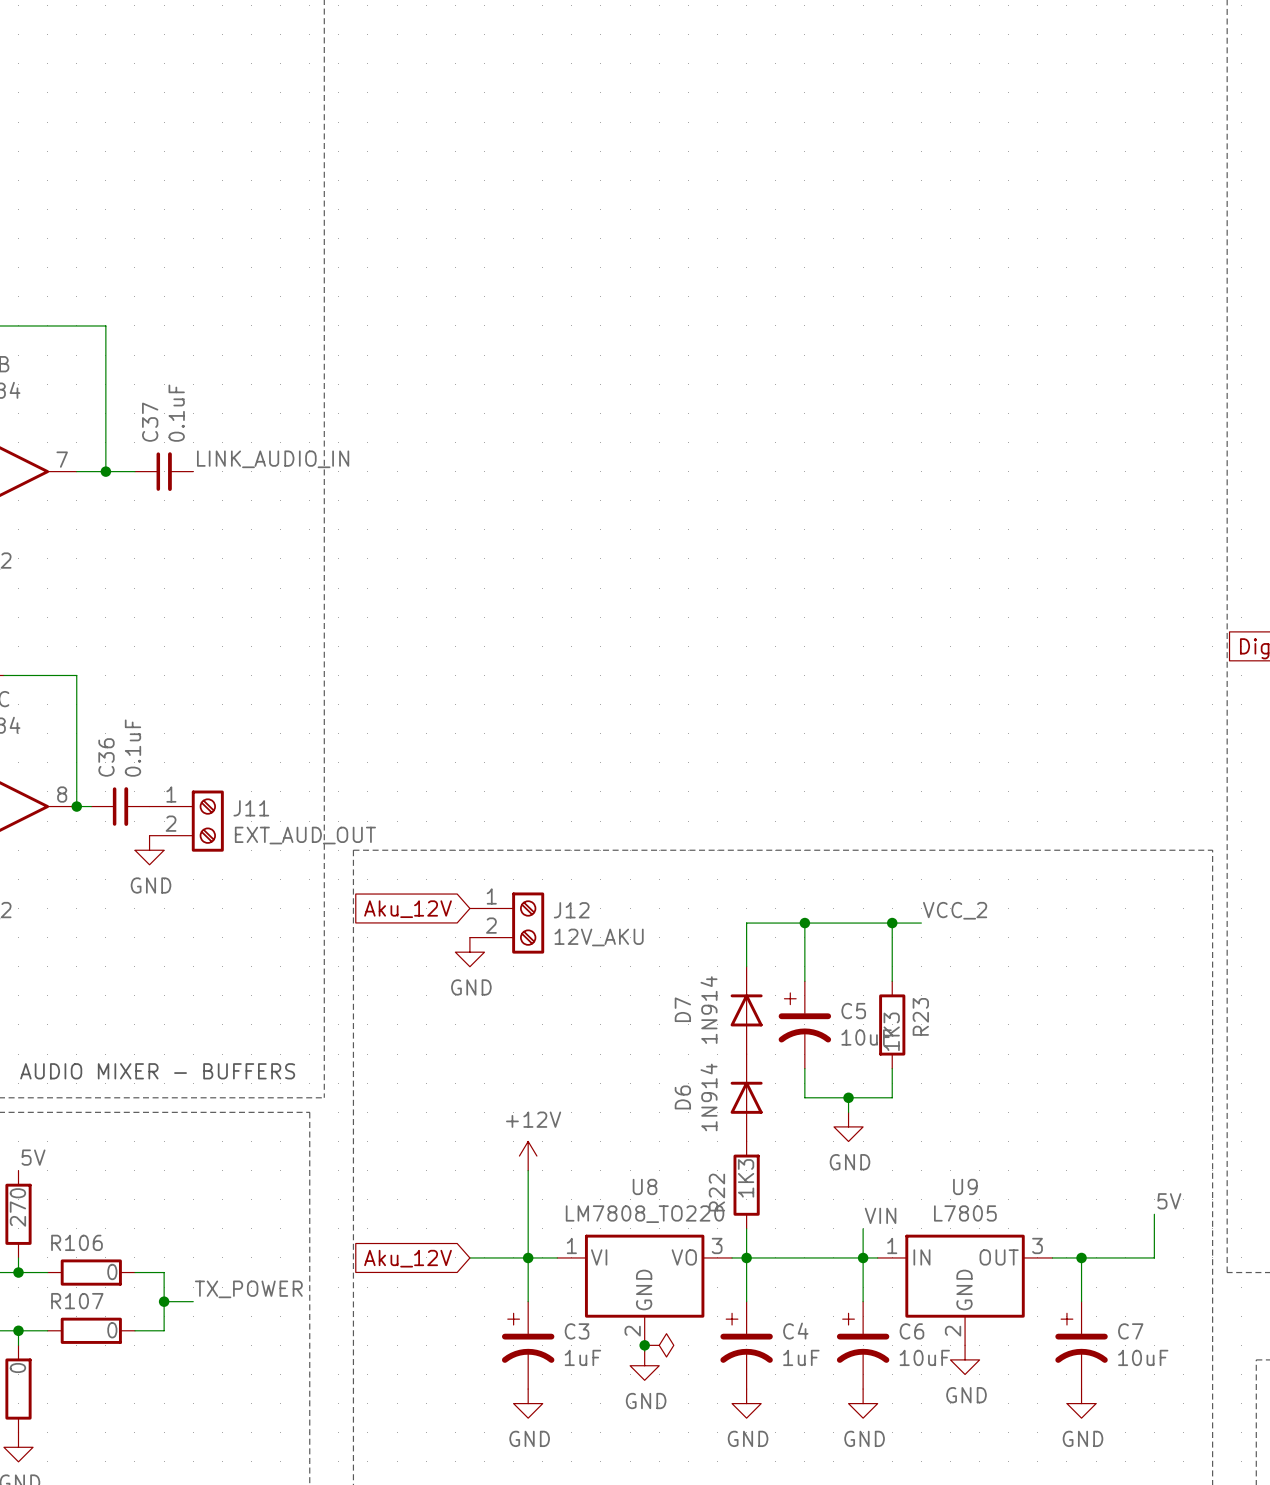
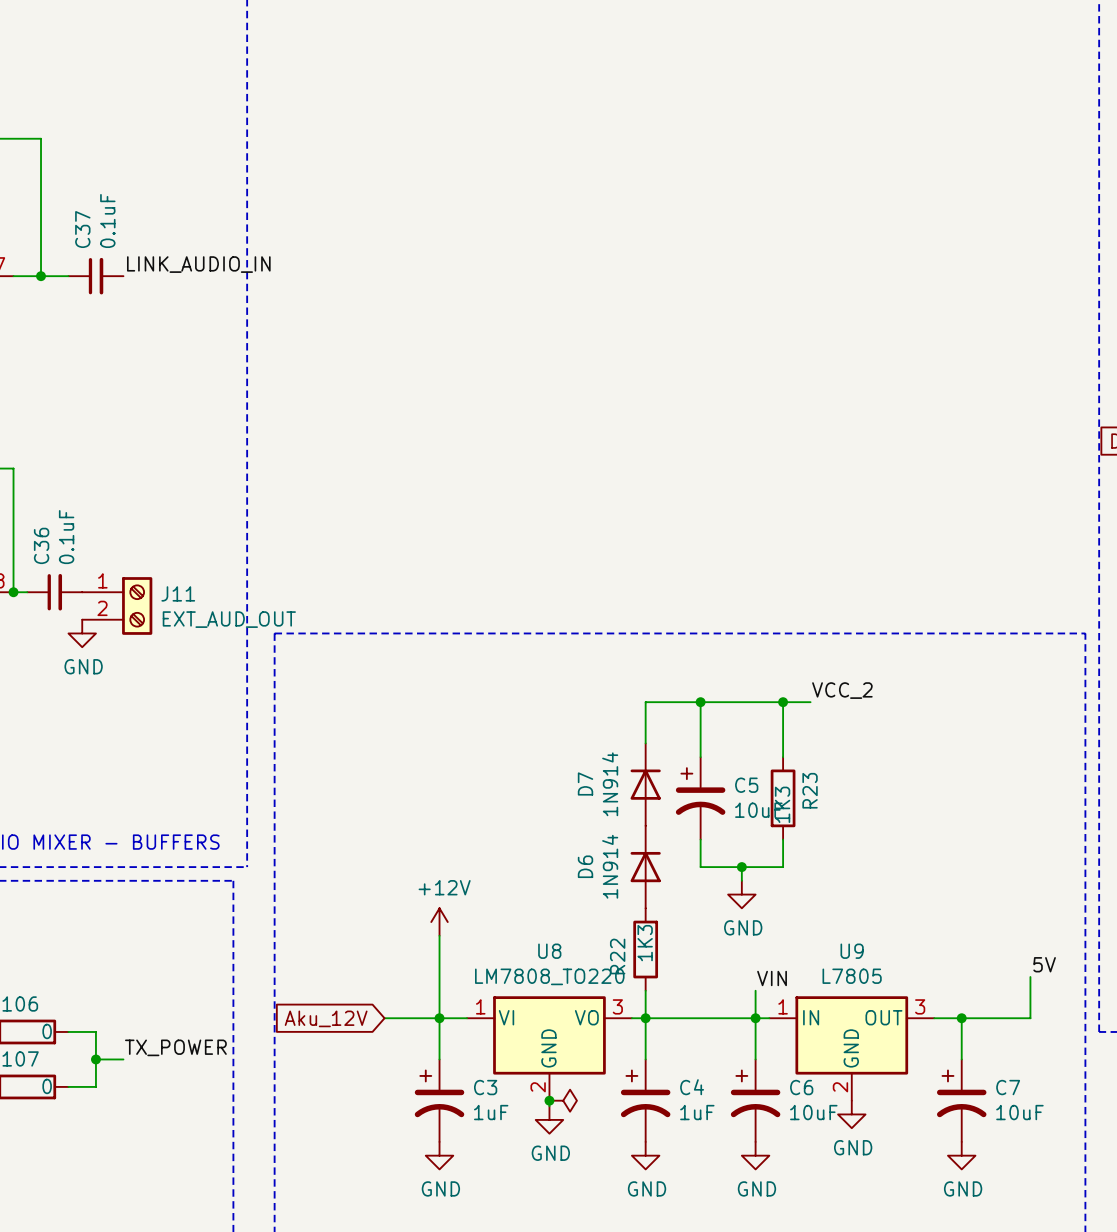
global label: Aku_12V (408, 909) -> none
J12: 12V_AKU (507, 923) -> none
power symbol: GND (469, 952) -> none

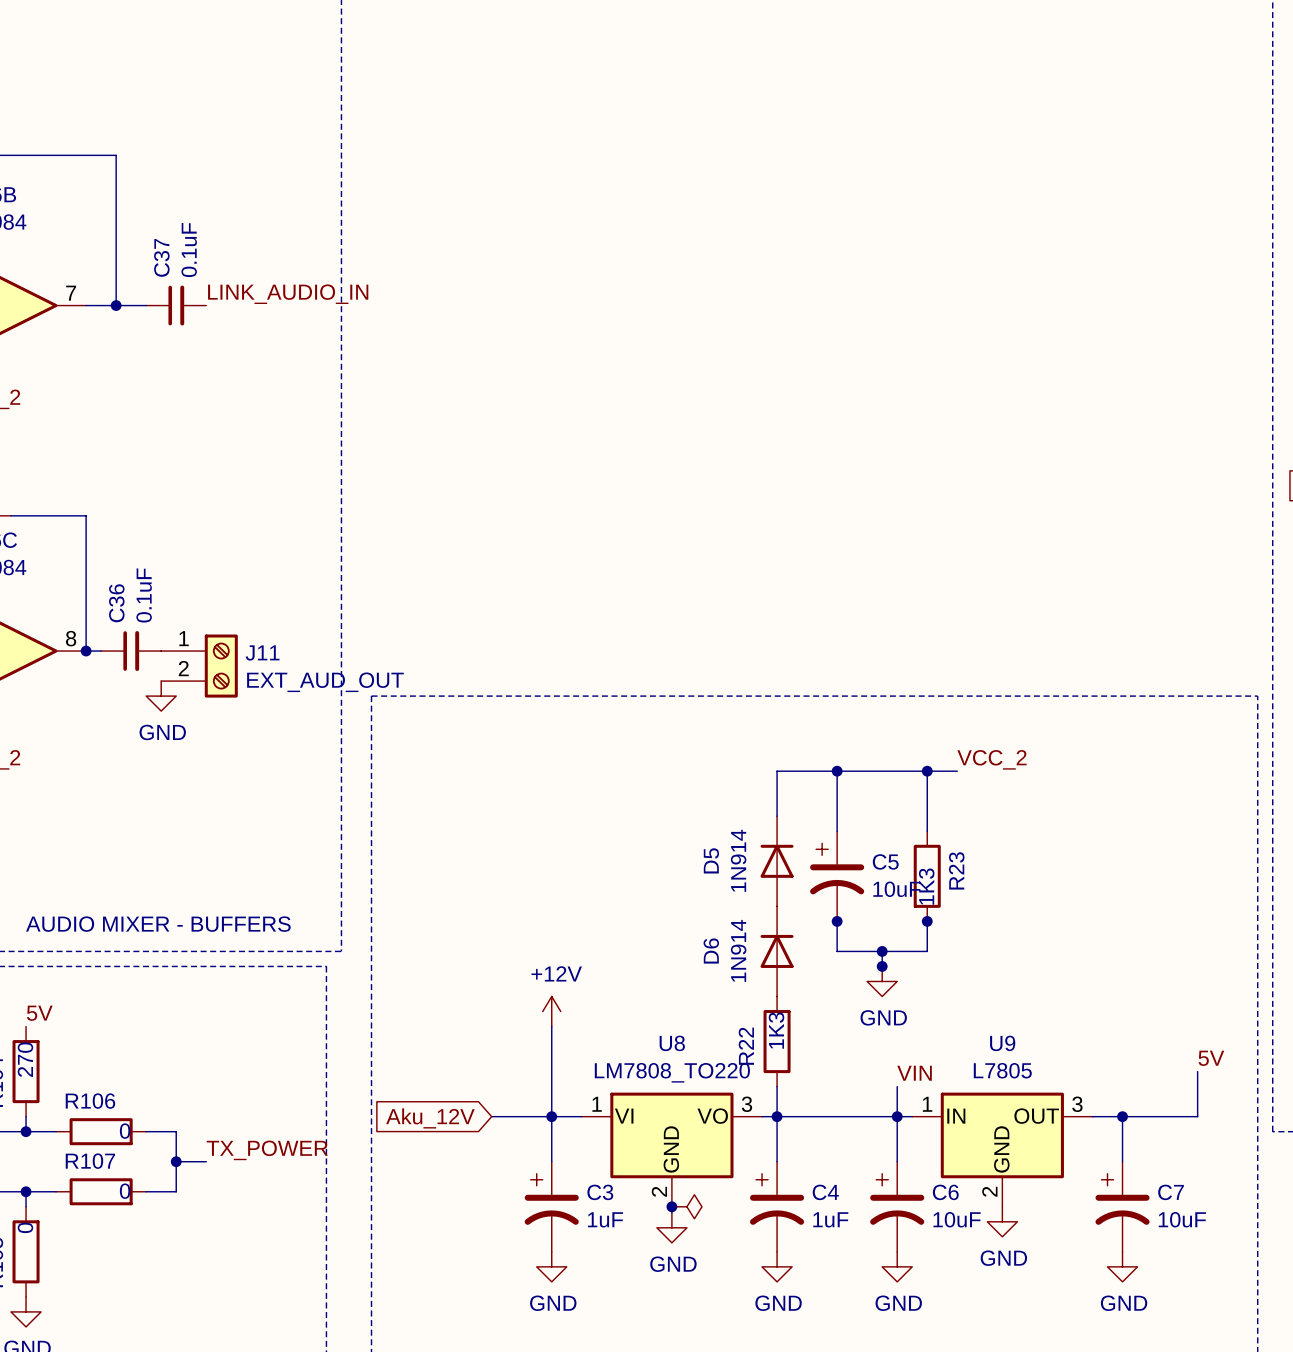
D7 name: D7 (585, 783) -> D5 (711, 860)
junction: none -> (837, 921)
junction: none -> (927, 921)
junction: none -> (882, 966)

